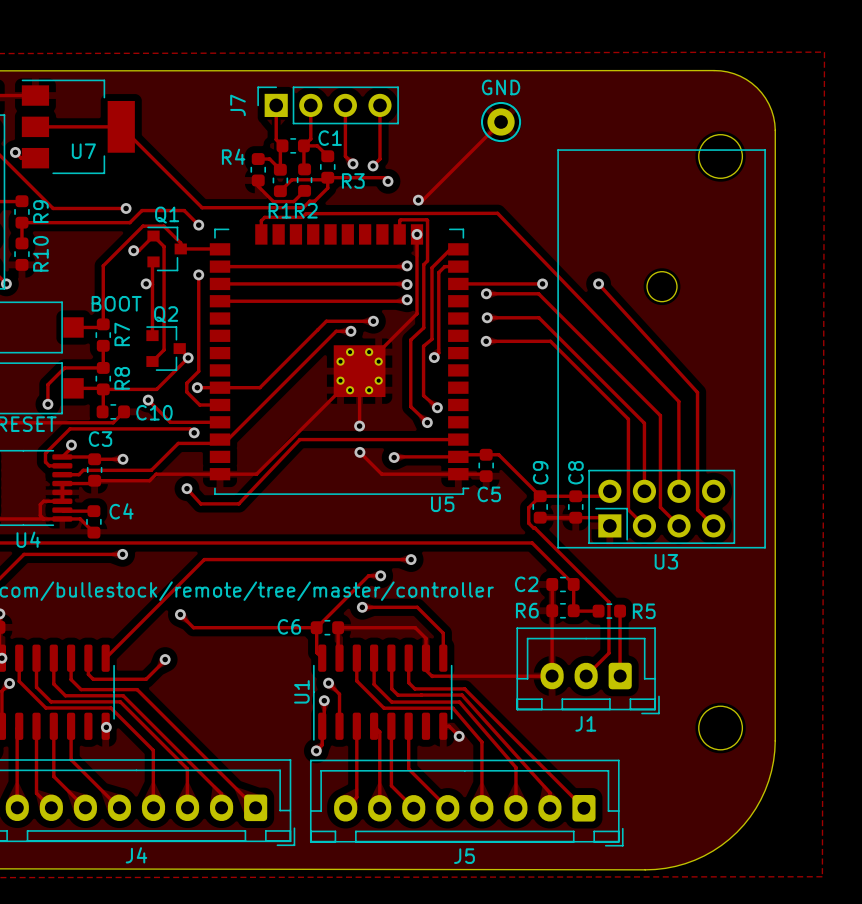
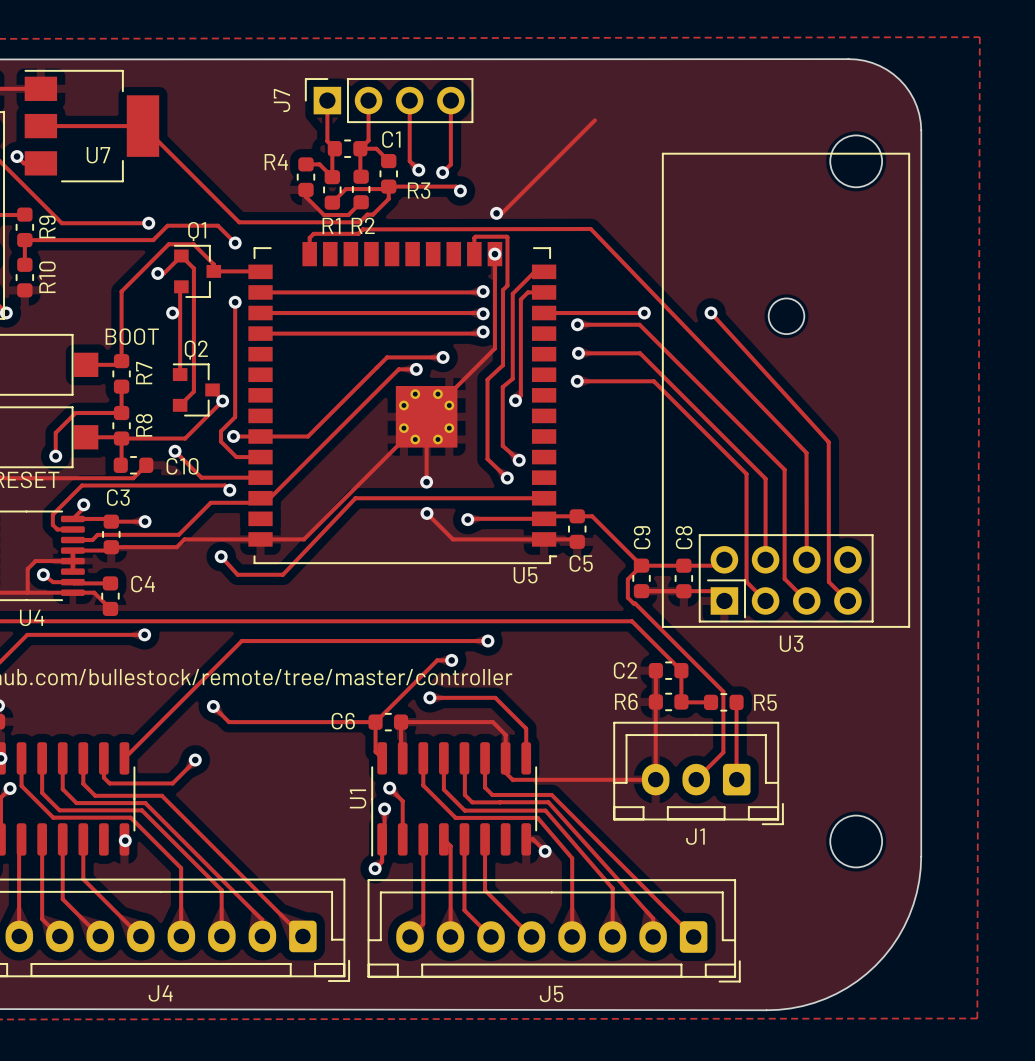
GND: (501, 122) -> none
track: none -> (72, 561) (35, 561) (27, 569) (27, 592)
track: (62, 501) (43, 501) (40, 504) (40, 515) (43, 518) -> none
track: none -> (43, 574) (53, 582) (72, 582)
via: none -> (43, 574)

